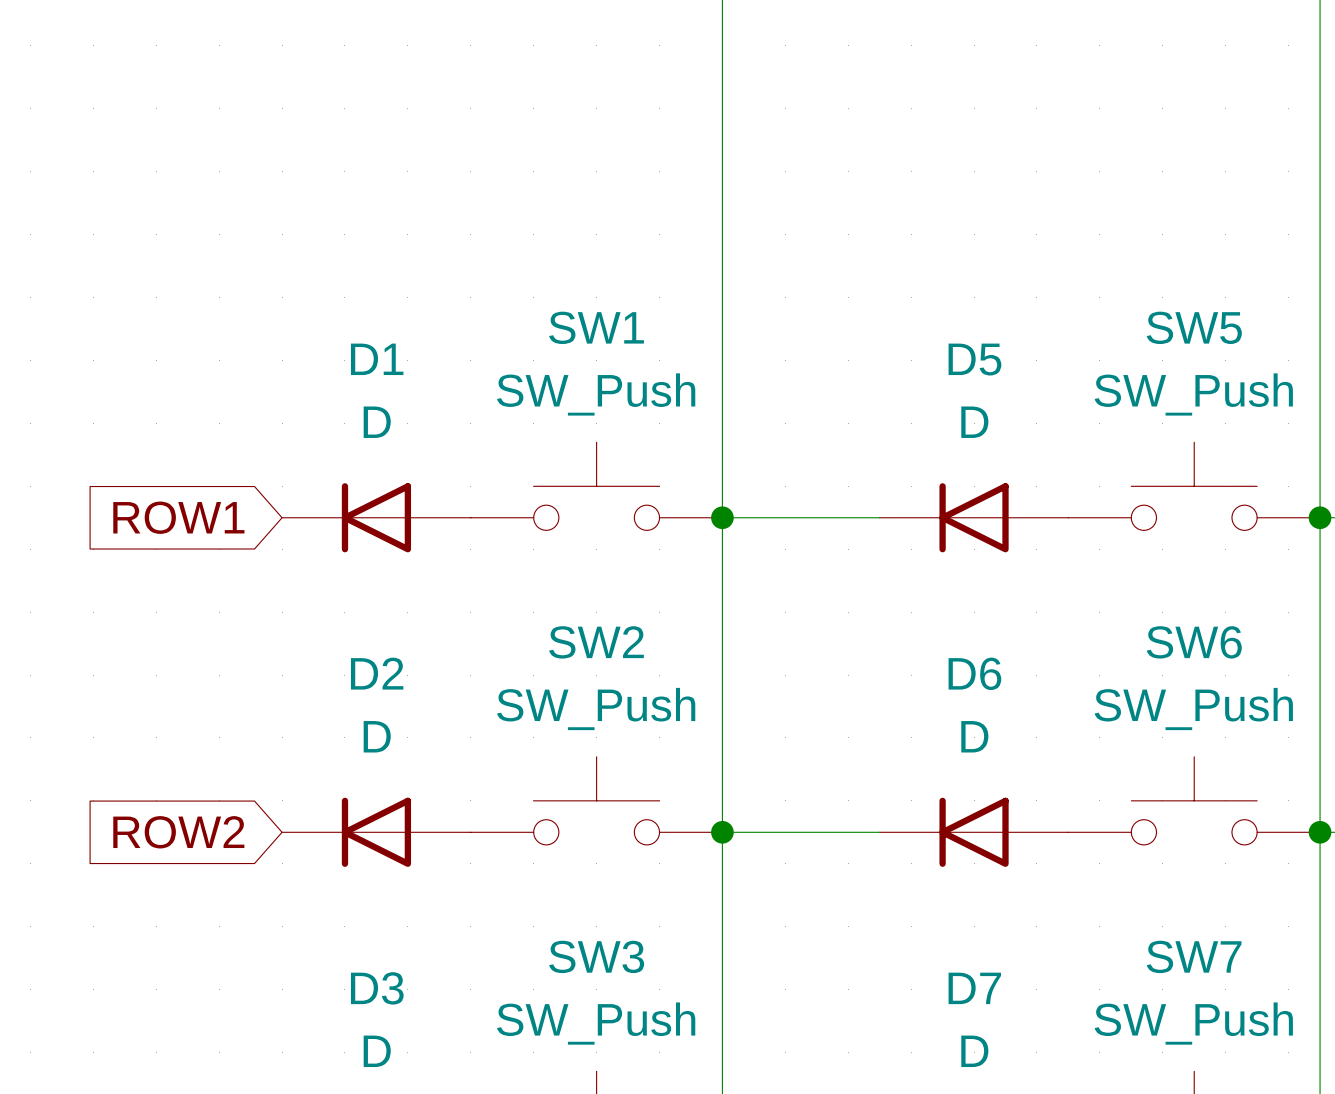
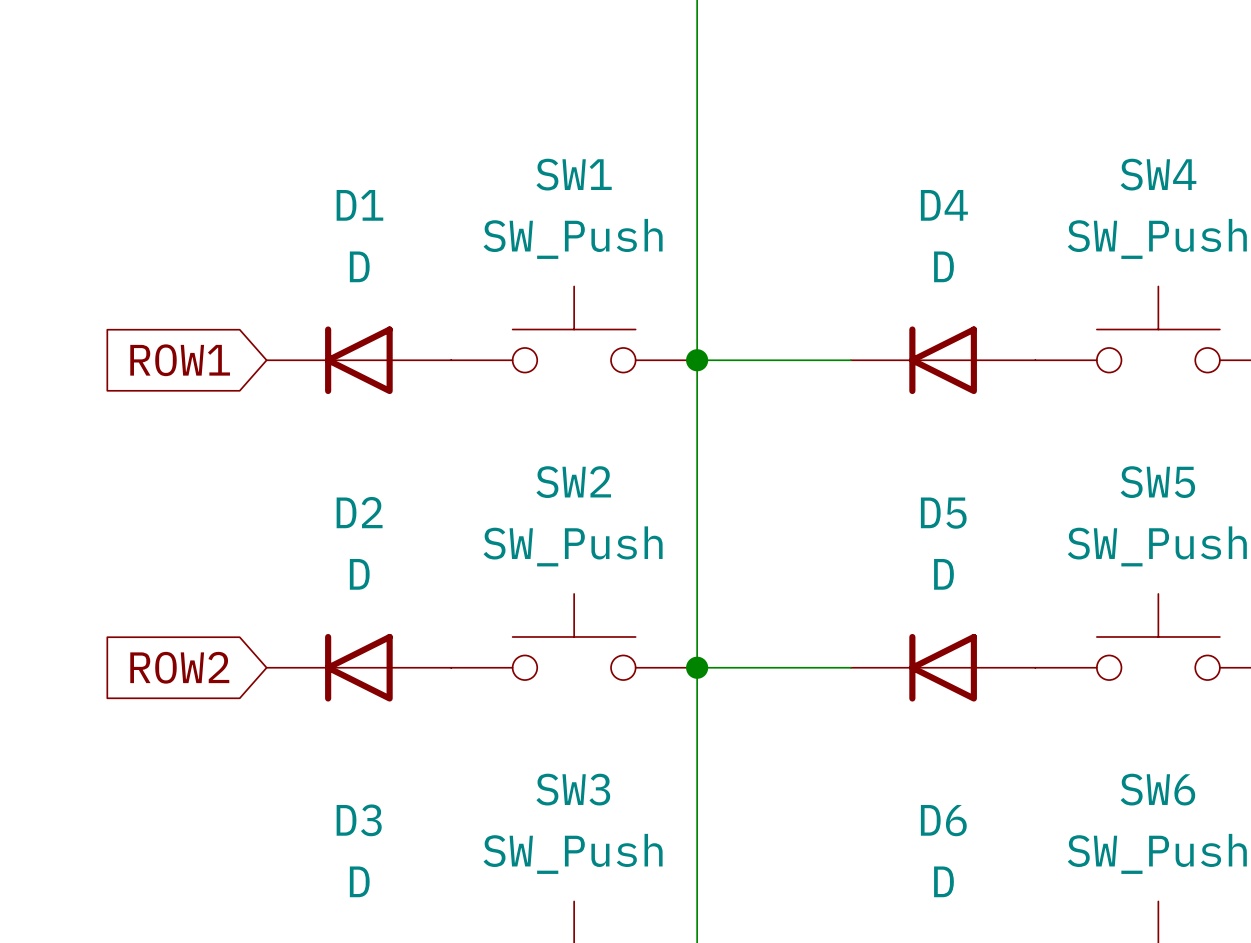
SW5 name: SW5 (1194, 327) -> SW4 (1158, 174)
D5 name: D5 (974, 359) -> D4 (944, 205)
SW6 name: SW6 (1194, 642) -> SW5 (1157, 482)
D6 name: D6 (974, 673) -> D5 (943, 513)
SW7 name: SW7 (1194, 956) -> SW6 (1157, 789)
D7 name: D7 (974, 988) -> D6 (943, 820)

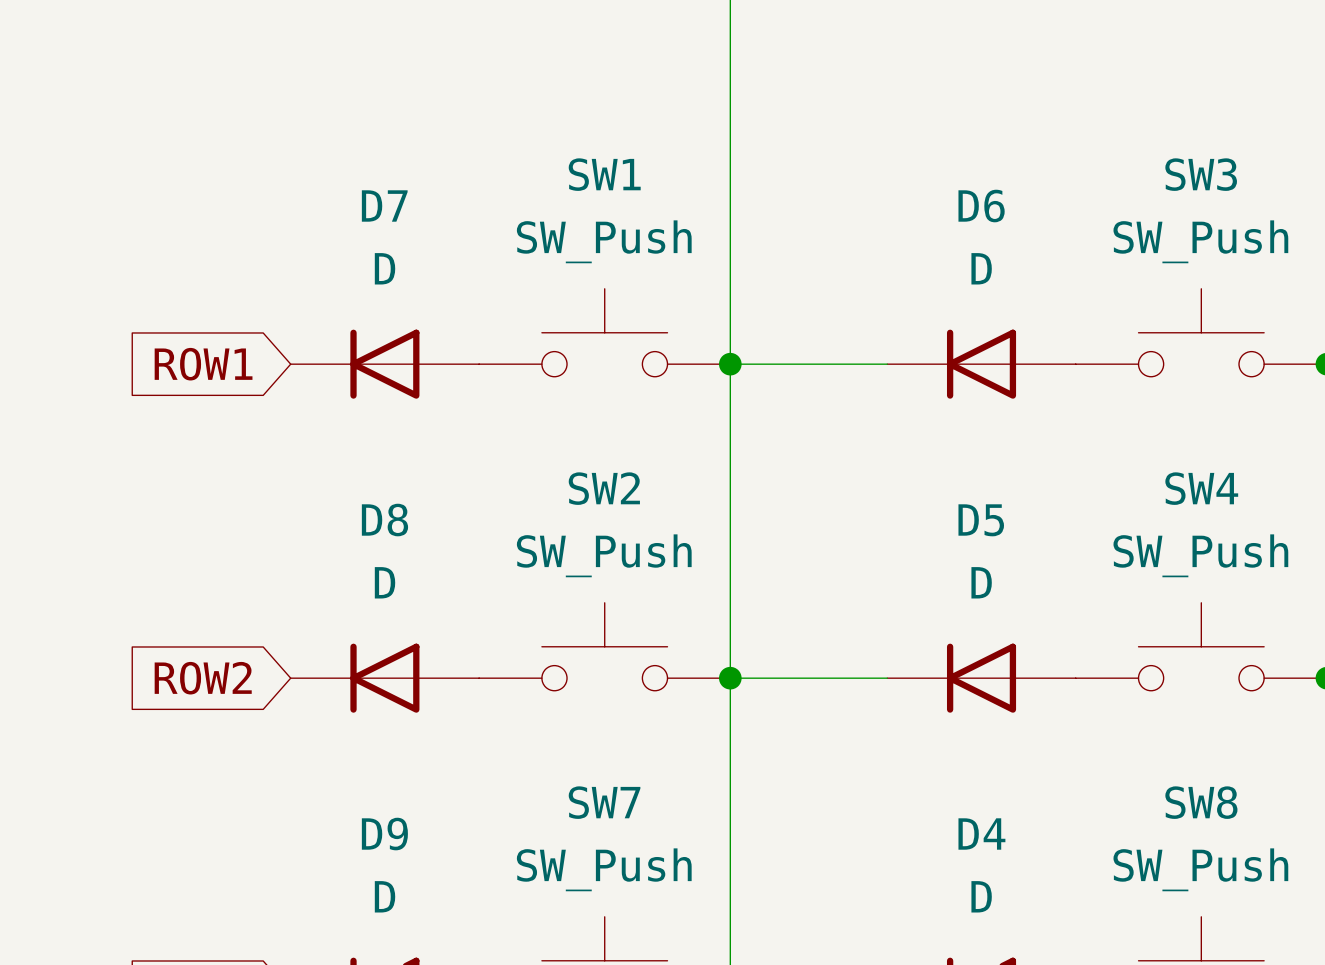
SW4 name: SW4 (1158, 174) -> SW3 (1201, 174)
D1 name: D1 (359, 205) -> D7 (384, 205)
D4 name: D4 (944, 205) -> D6 (981, 206)
SW5 name: SW5 (1157, 482) -> SW4 (1201, 488)
D2 name: D2 (359, 512) -> D8 (384, 520)
SW3 name: SW3 (573, 789) -> SW7 (604, 802)
SW6 name: SW6 (1157, 789) -> SW8 (1201, 802)
D3 name: D3 (359, 820) -> D9 (384, 834)
D6 name: D6 (943, 820) -> D4 (981, 834)

